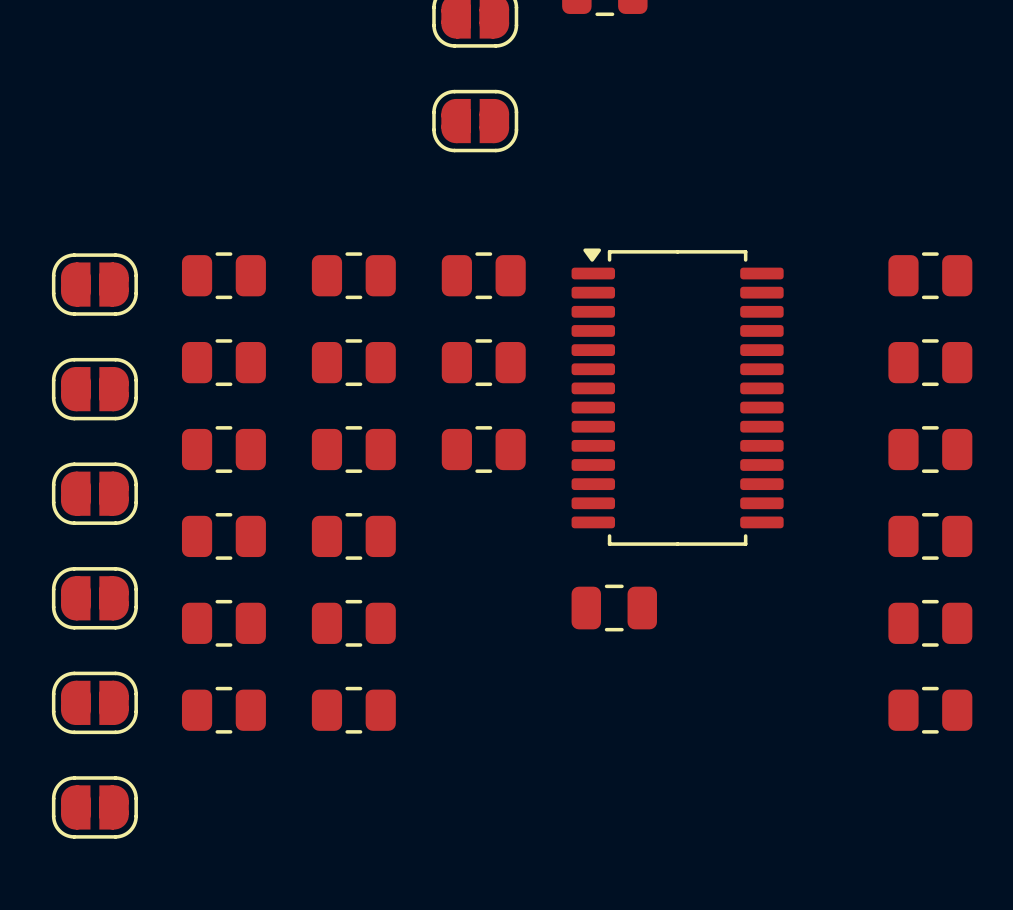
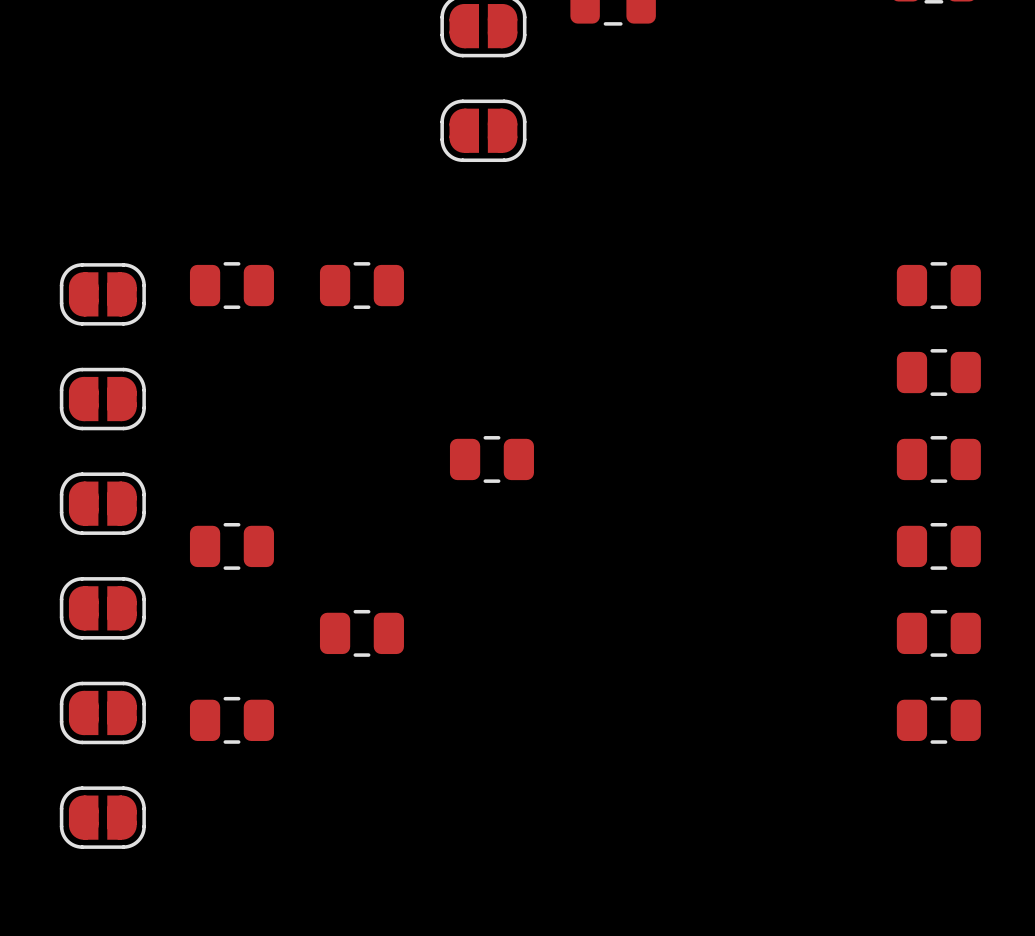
part: (483, 275) -> none
part: (223, 362) -> none
part: (353, 362) -> none
part: (483, 362) -> none
part: (677, 397) -> none
part: (223, 449) -> none
part: (353, 449) -> none
part: (353, 536) -> none
part: (614, 608) -> none
part: (223, 623) -> none
part: (353, 710) -> none

